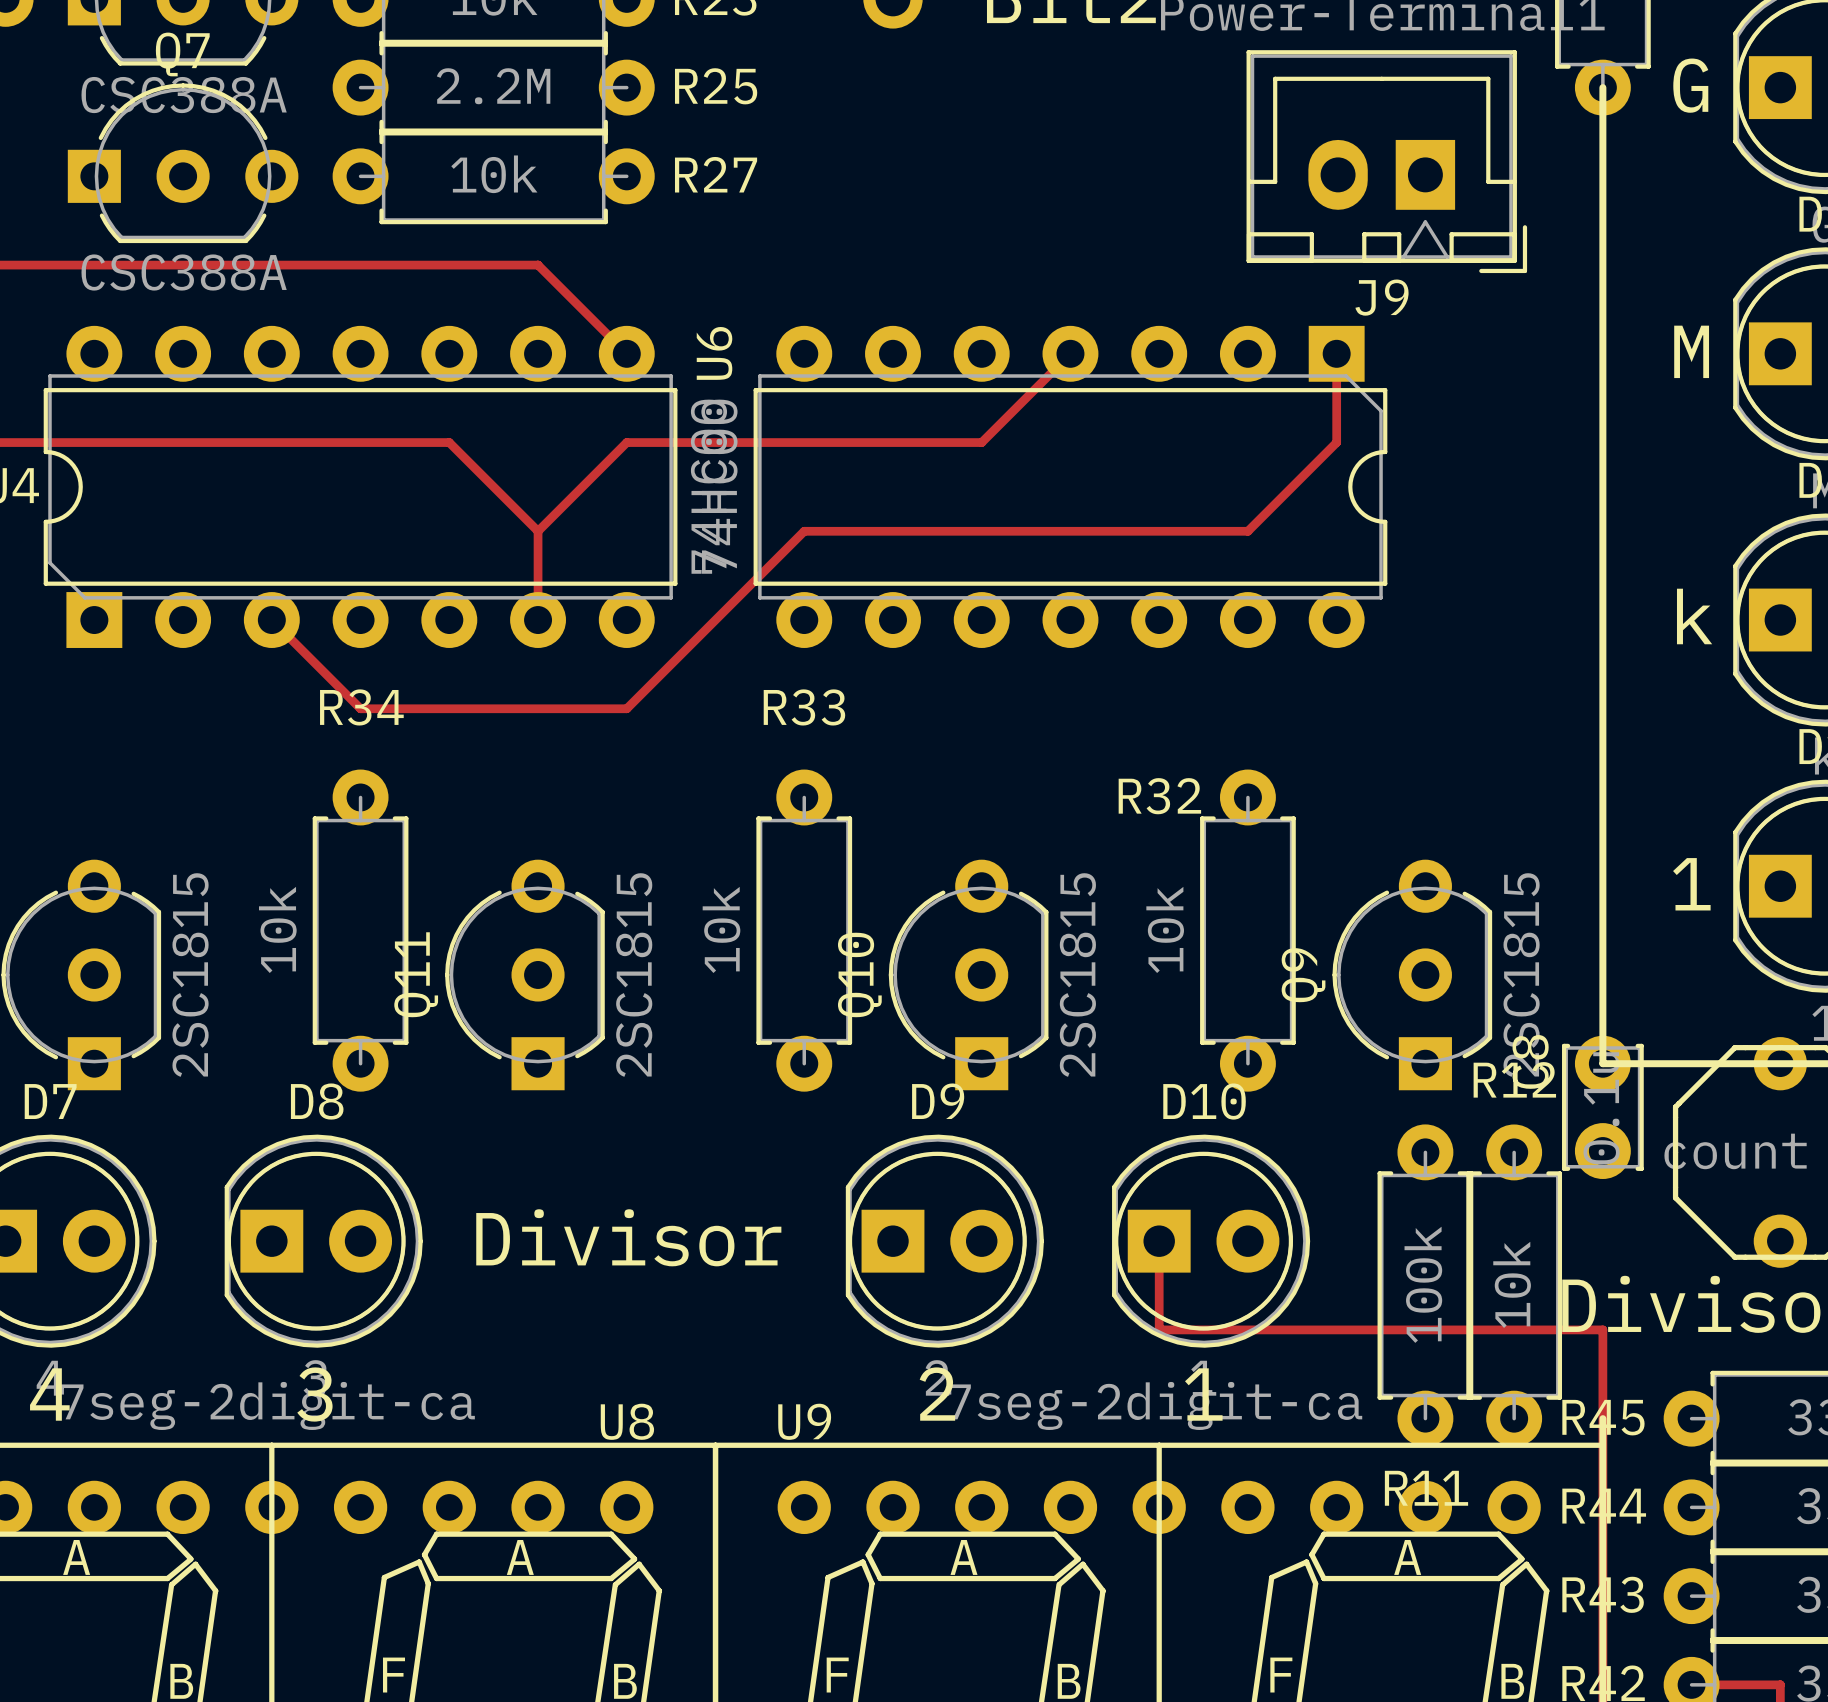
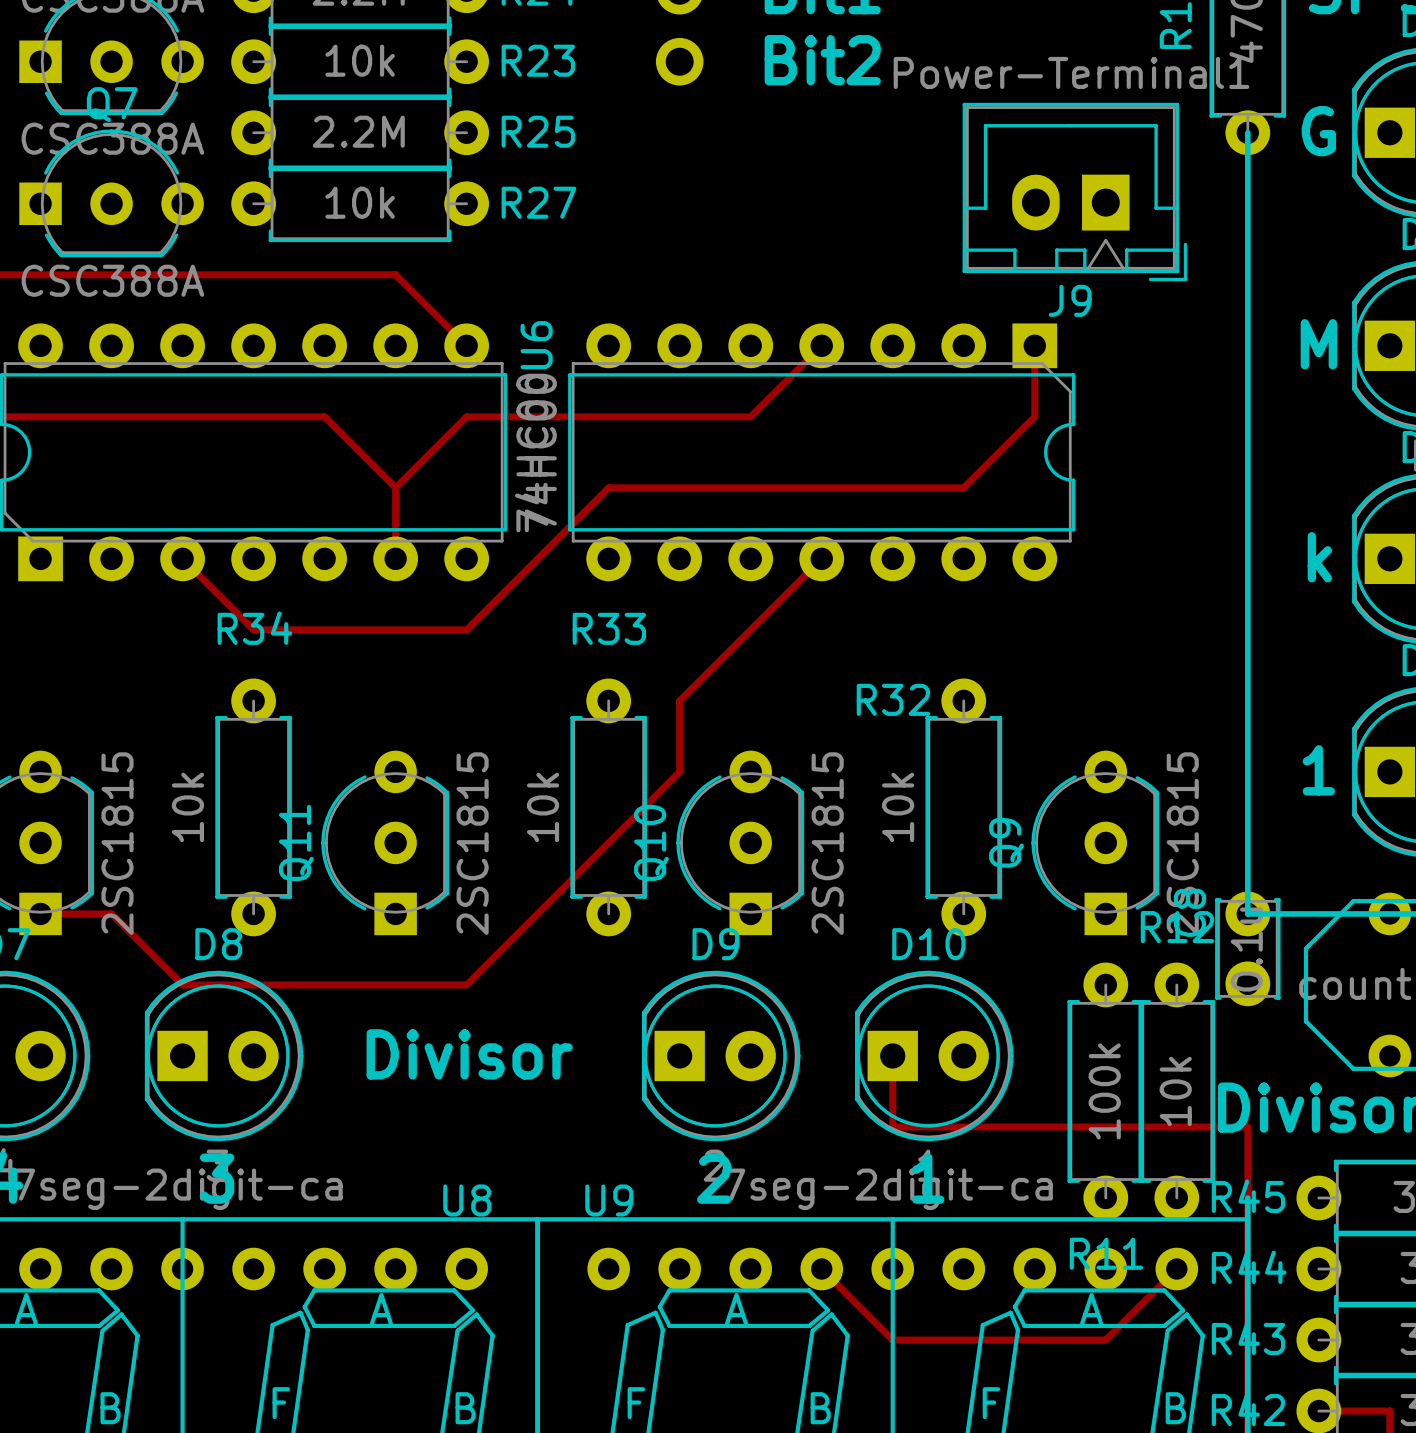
track: none -> (821, 558) (679, 700) (679, 771) (466, 984) (182, 984) (111, 913) (40, 913)
track: none -> (821, 1269) (892, 1340) (1105, 1340) (1176, 1269)

